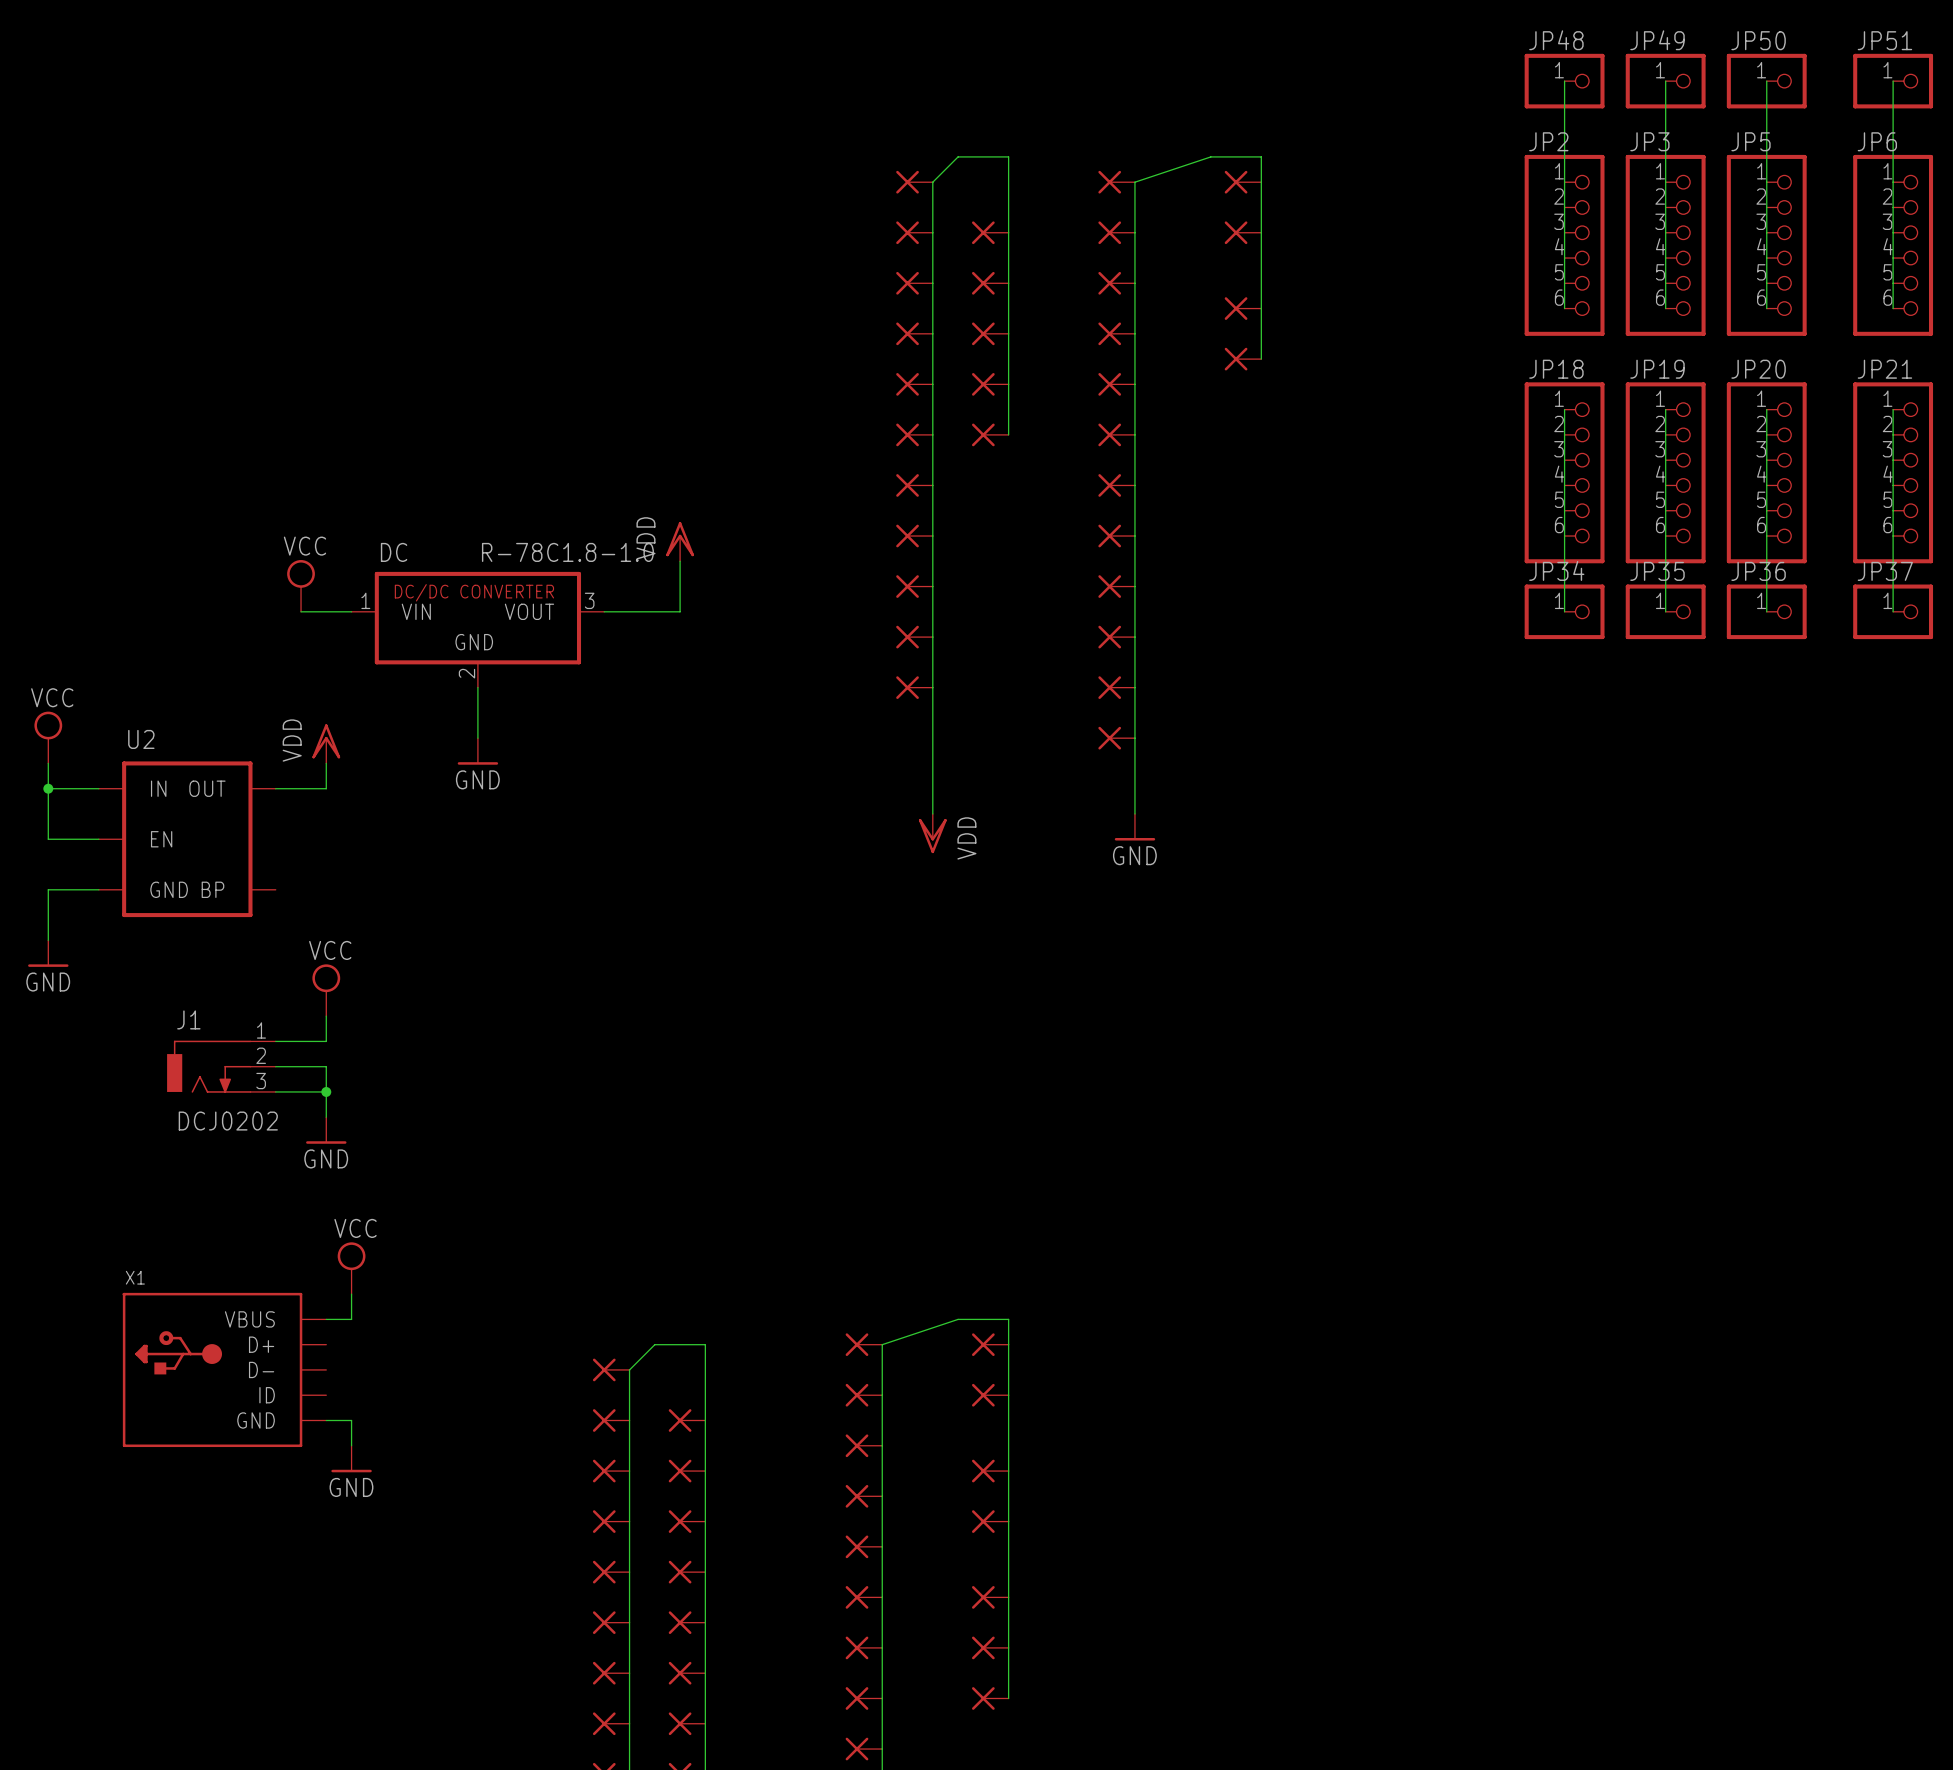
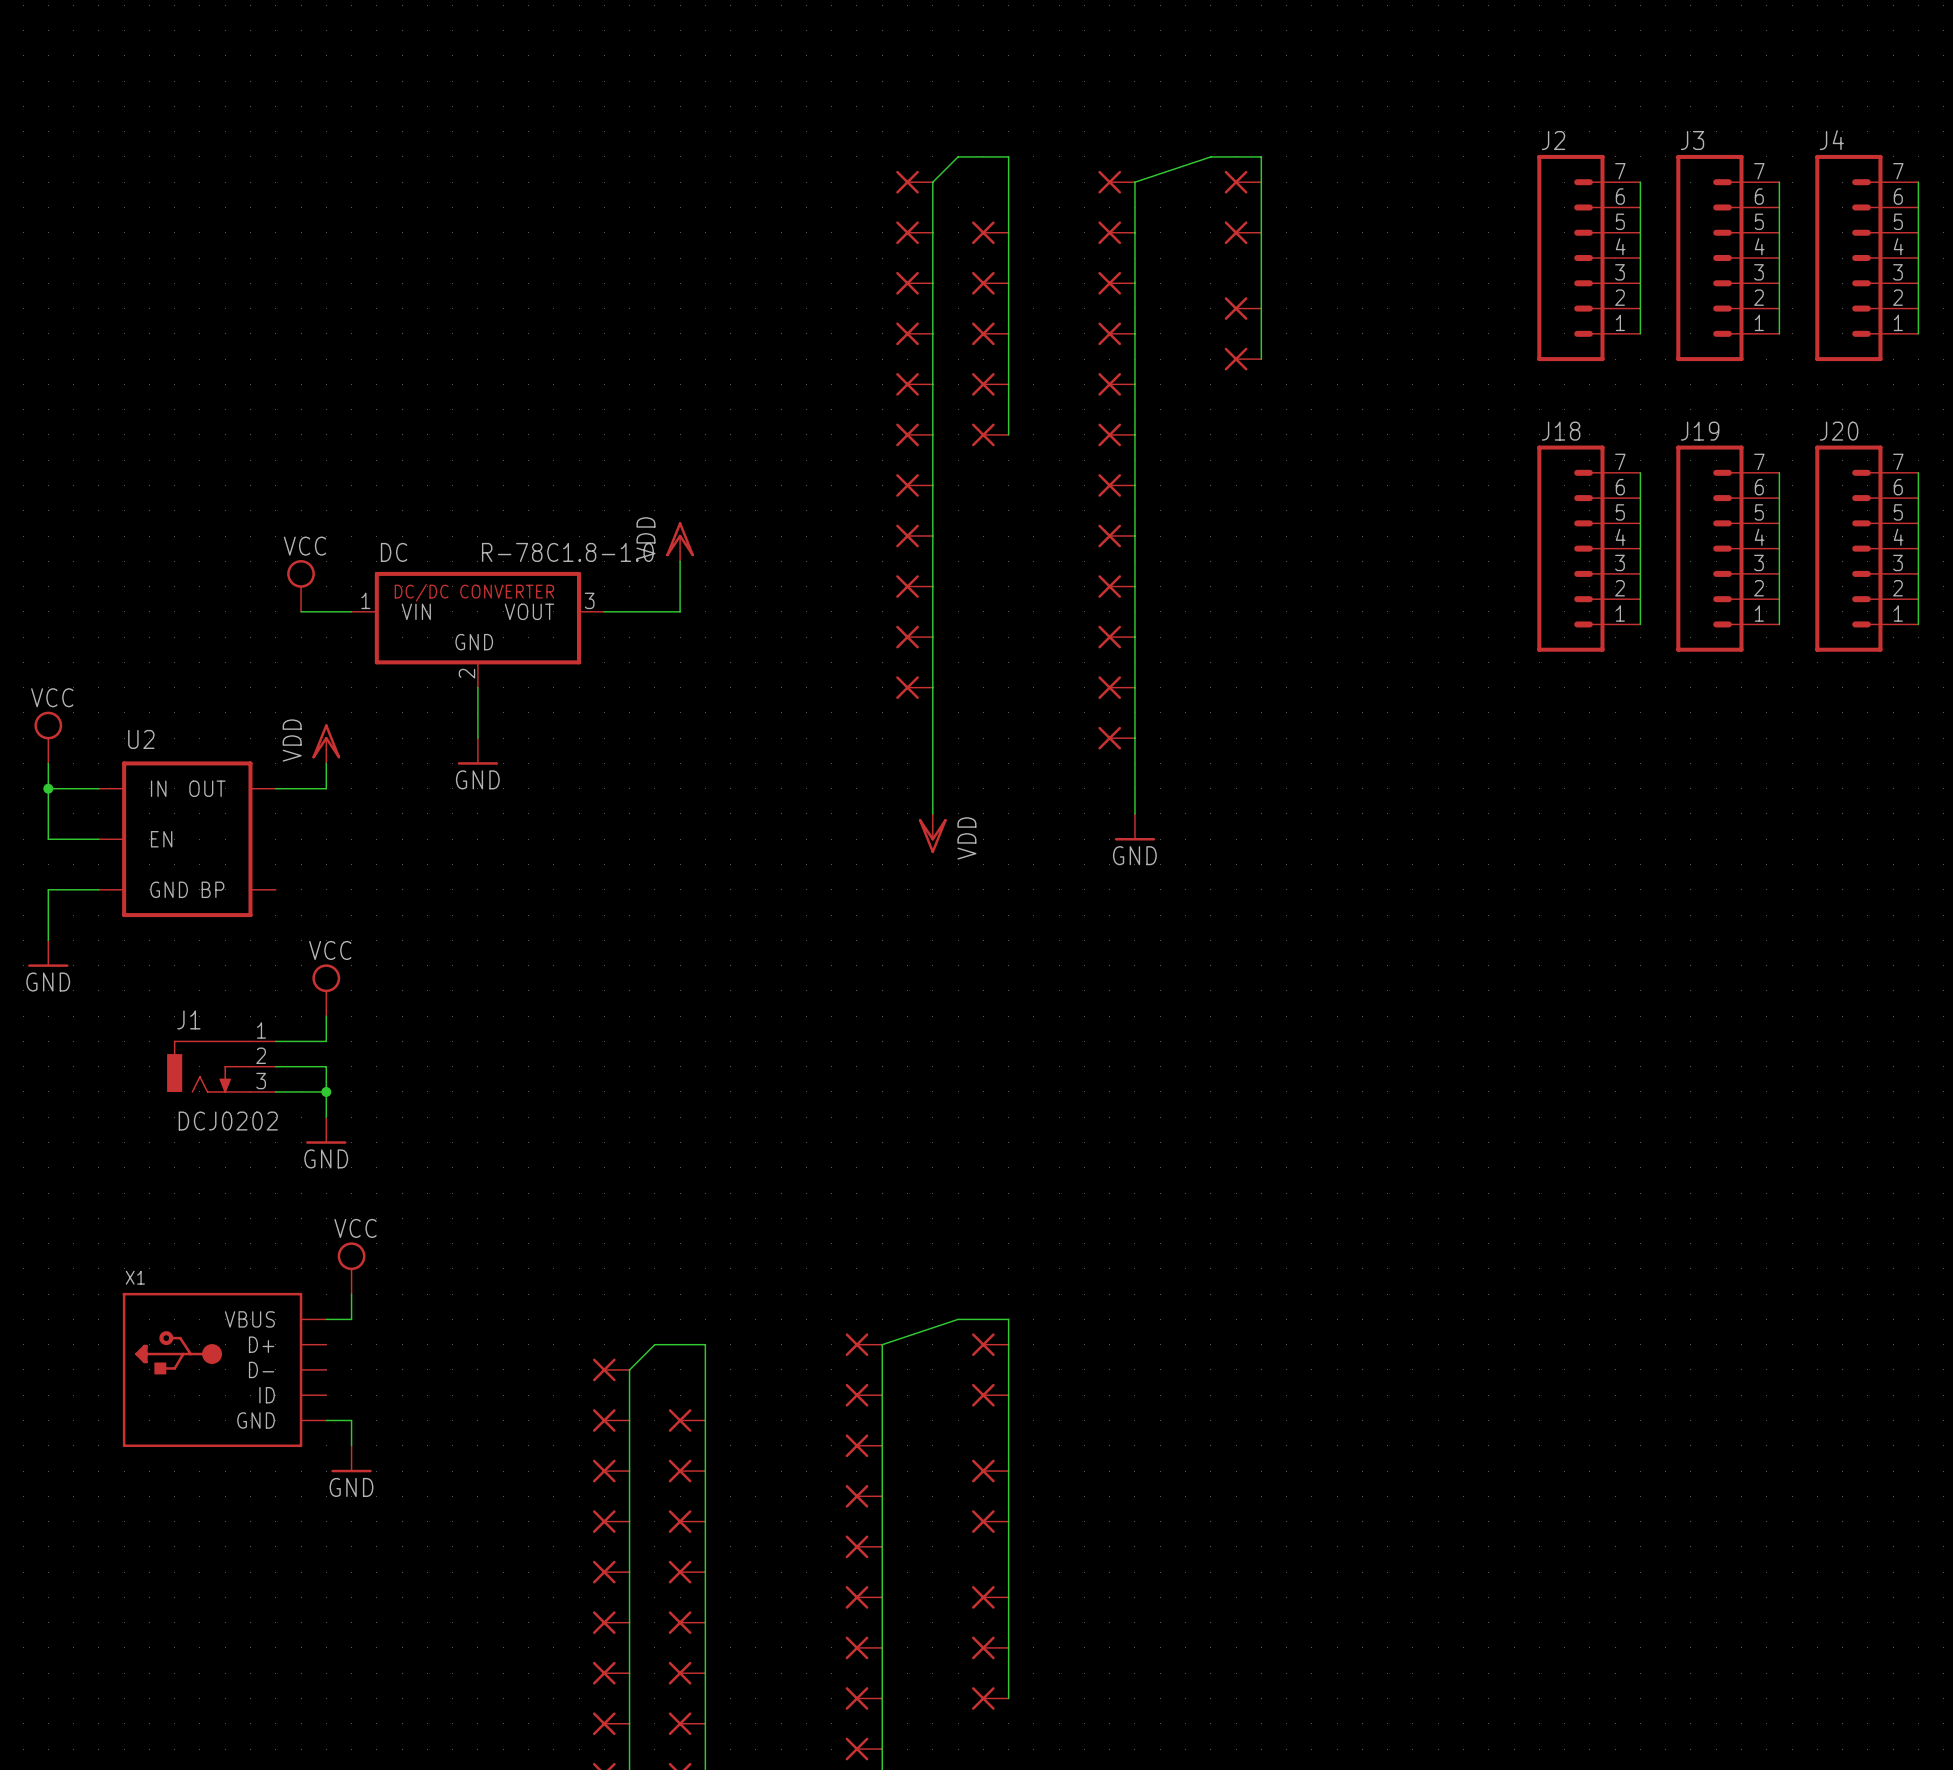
wire: (1564, 81) (1564, 308) -> none
JP48: (1564, 81) -> none
wire: (1665, 81) (1665, 308) -> none
JP49: (1665, 81) -> none
wire: (1766, 81) (1766, 308) -> none
JP50: (1766, 81) -> none
wire: (1893, 81) (1893, 308) -> none
JP51: (1893, 81) -> none
wire: none -> (1640, 182) (1640, 333)
wire: none -> (1779, 182) (1779, 333)
wire: none -> (1918, 182) (1918, 333)
JP2: (1564, 245) -> none
JP3: (1665, 245) -> none
JP5: (1766, 245) -> none
JP6: (1893, 245) -> none
J2: none -> (1588, 258)
J3: none -> (1727, 258)
J4: none -> (1866, 258)
wire: (1564, 409) (1564, 611) -> none
wire: (1665, 409) (1665, 611) -> none
wire: (1766, 409) (1766, 611) -> none
wire: (1893, 409) (1893, 611) -> none
JP18: (1564, 472) -> none
wire: none -> (1640, 472) (1640, 624)
JP19: (1665, 472) -> none
JP20: (1766, 472) -> none
wire: none -> (1779, 472) (1779, 624)
JP21: (1893, 472) -> none
wire: none -> (1918, 472) (1918, 624)
J18: none -> (1588, 548)
J19: none -> (1727, 548)
J20: none -> (1866, 548)
JP34: (1564, 611) -> none
JP35: (1665, 611) -> none
JP36: (1766, 611) -> none
JP37: (1893, 611) -> none

